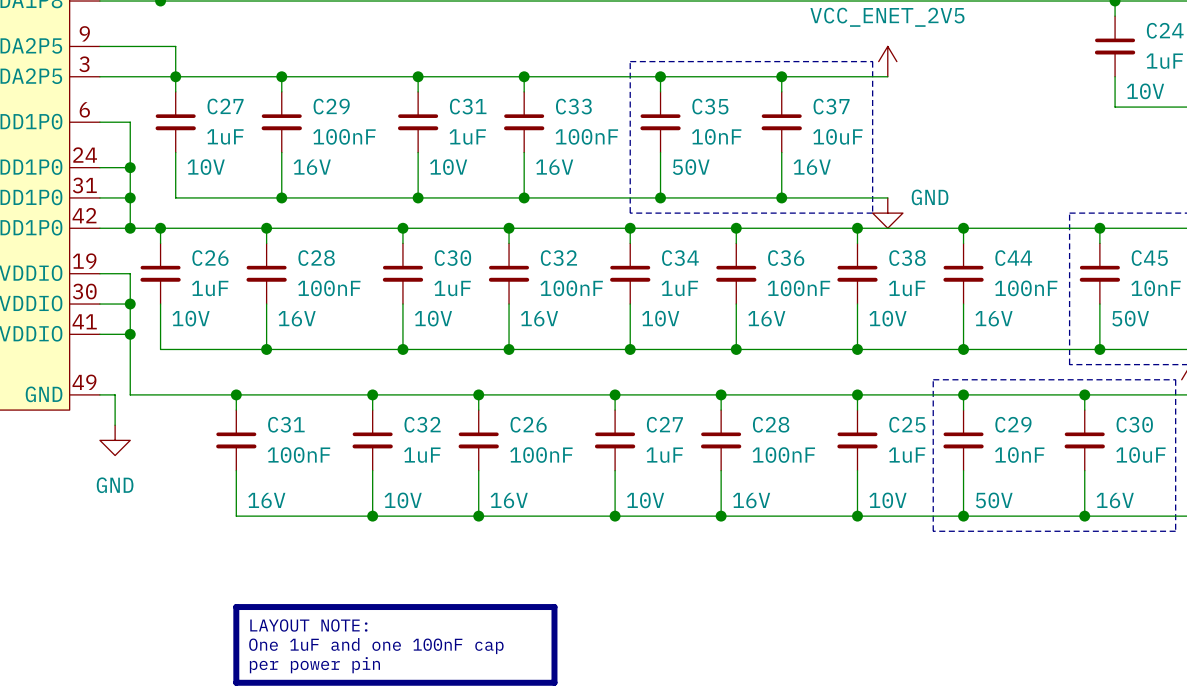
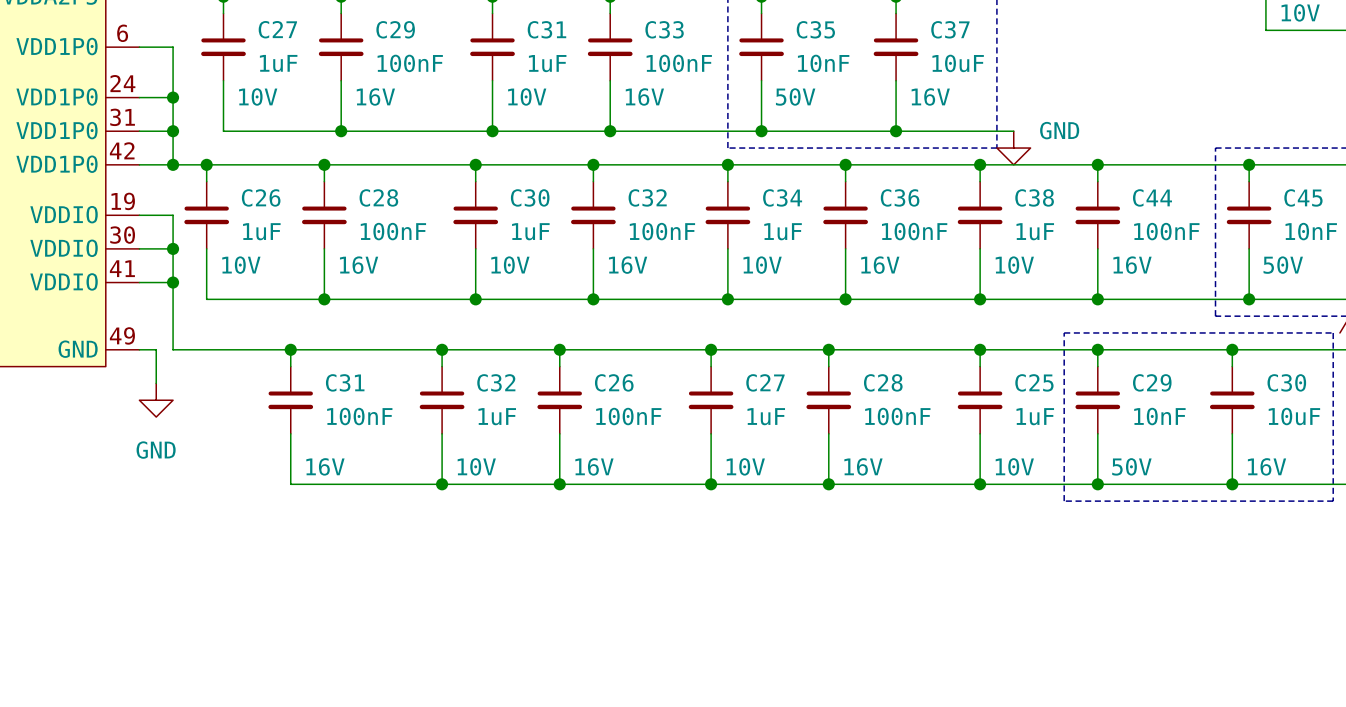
line: (236, 607) (554, 607) (554, 682) (236, 682) (236, 607) -> none
text: LAYOUT NOTE: (308, 625) -> none
text: One 1uF and one 100nF cap (376, 646) -> none
text: per power pin (314, 665) -> none

